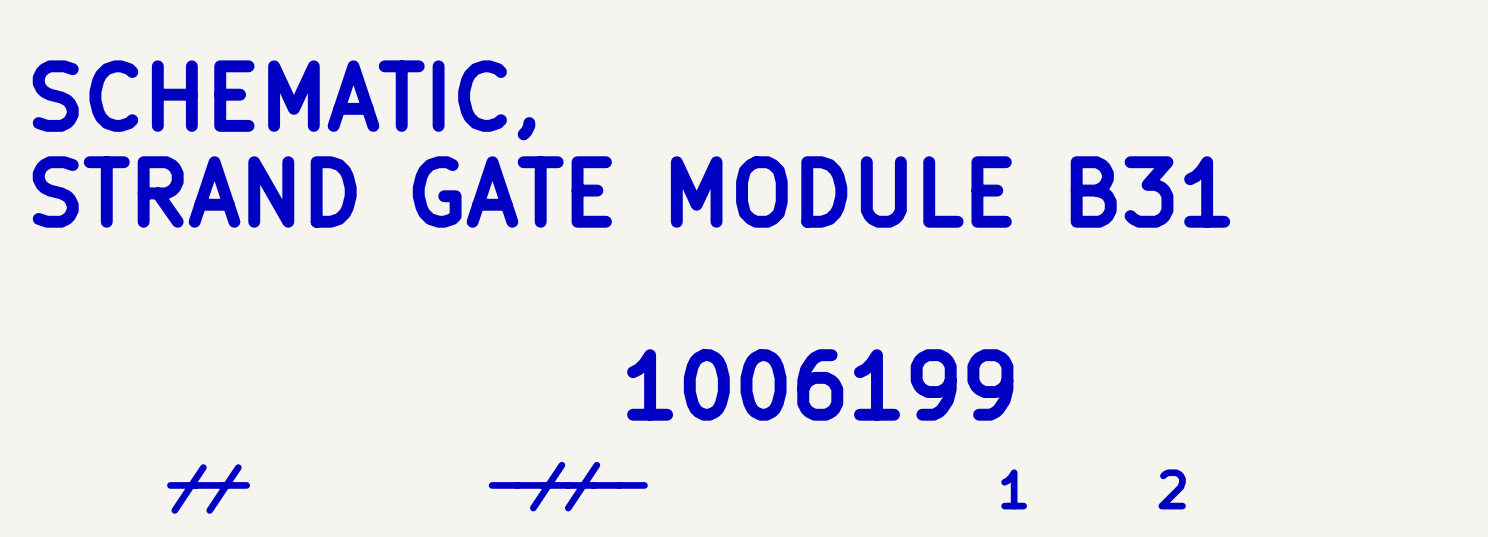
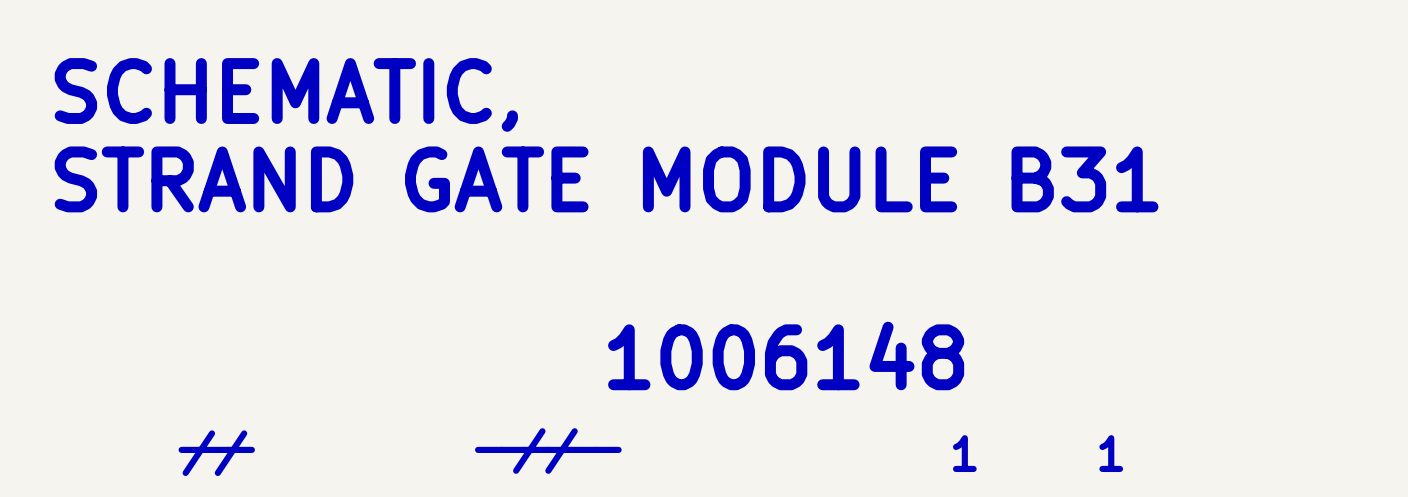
text: 1006199 (820, 384) -> 1006148 (786, 355)
text: 1 2 (1093, 489) -> 1 1 (1038, 453)

